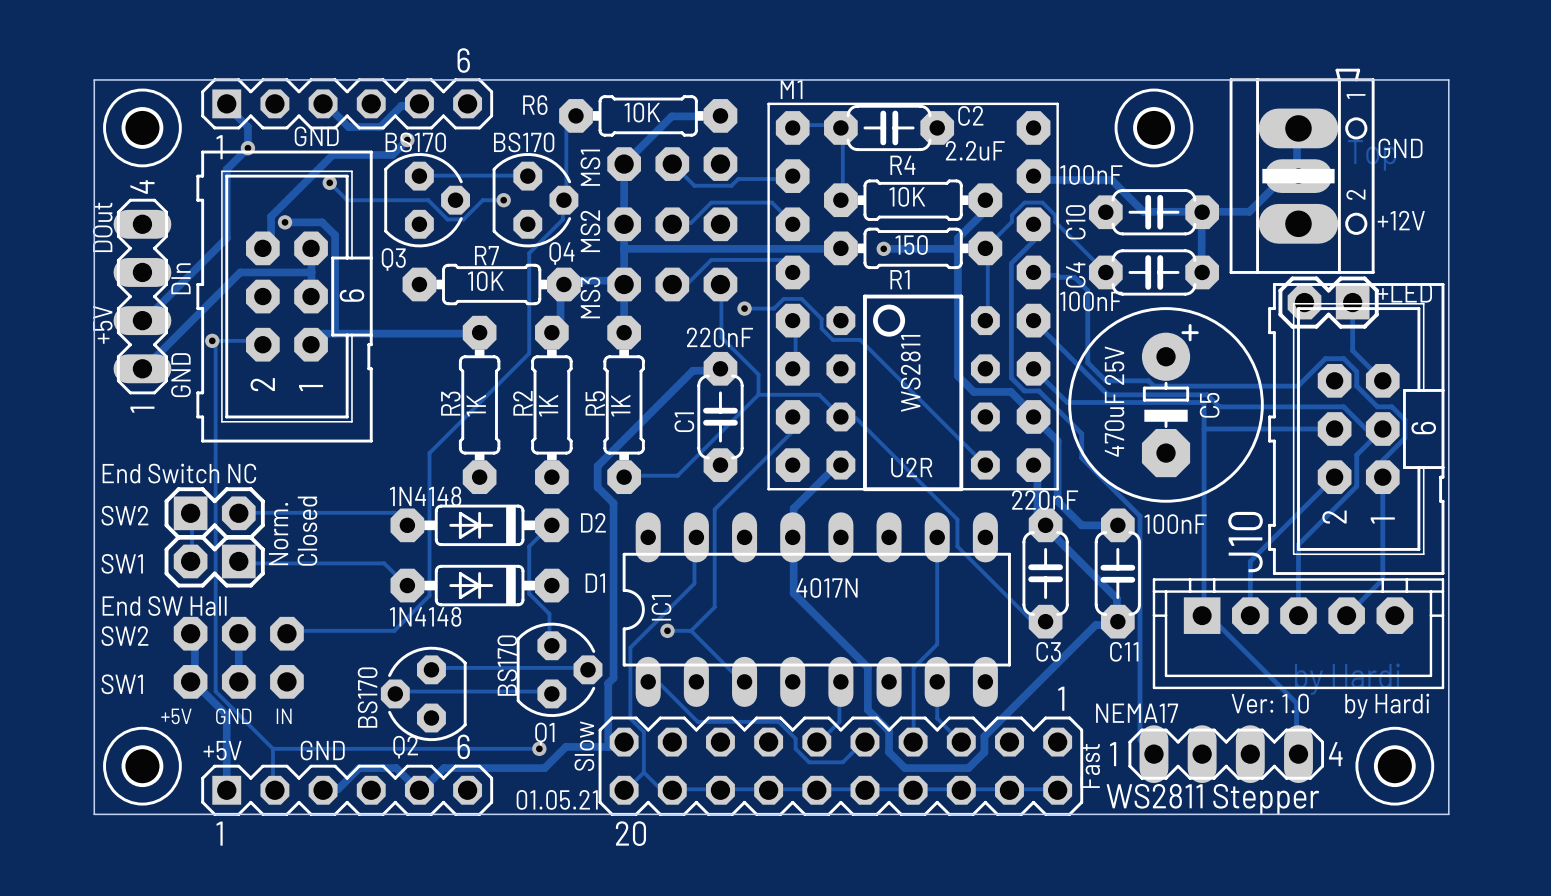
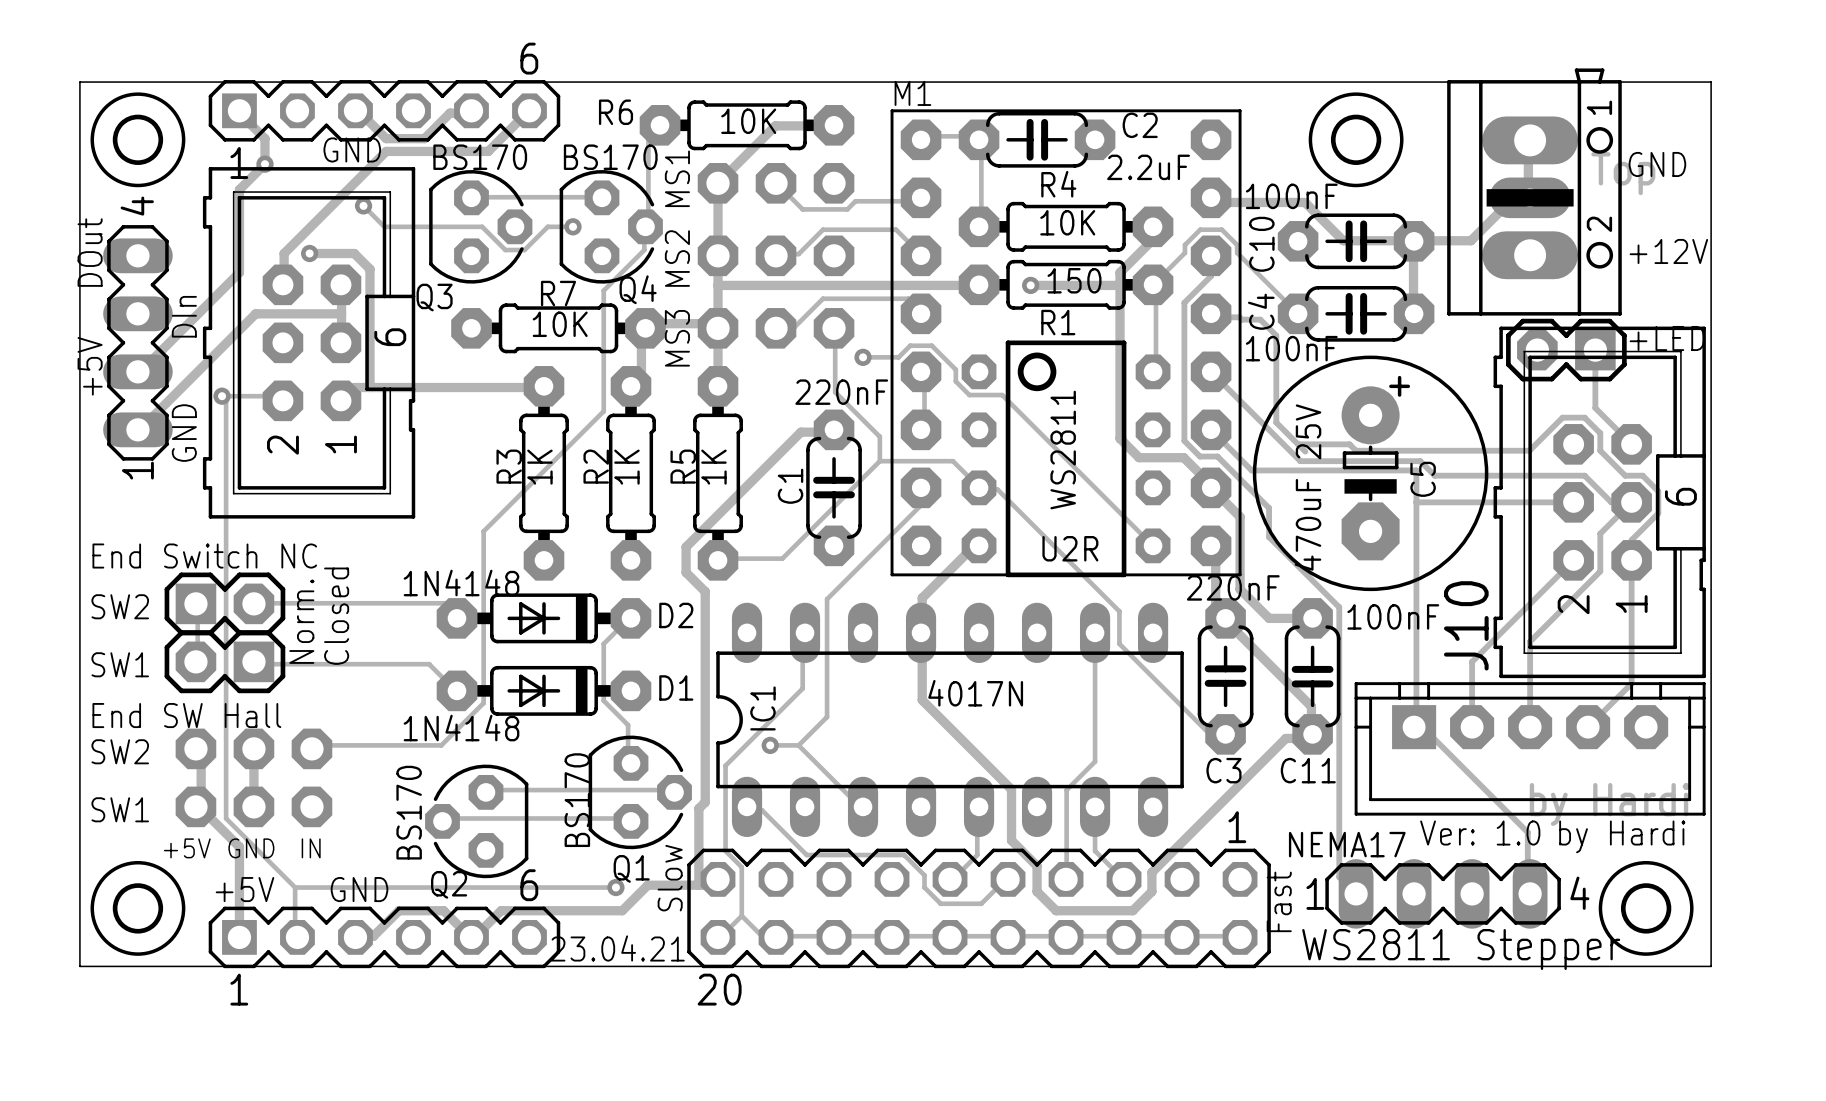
track: (407, 139) (392, 154) (332, 154) (271, 216) (271, 240) (262, 248) -> (529, 110) (488, 151) (386, 151) (284, 253) (282, 284)
via: (407, 139) -> none
track: none -> (1298, 444) (1305, 451)
text: 01.05.21 (557, 799) -> 23.04.21 (617, 948)

